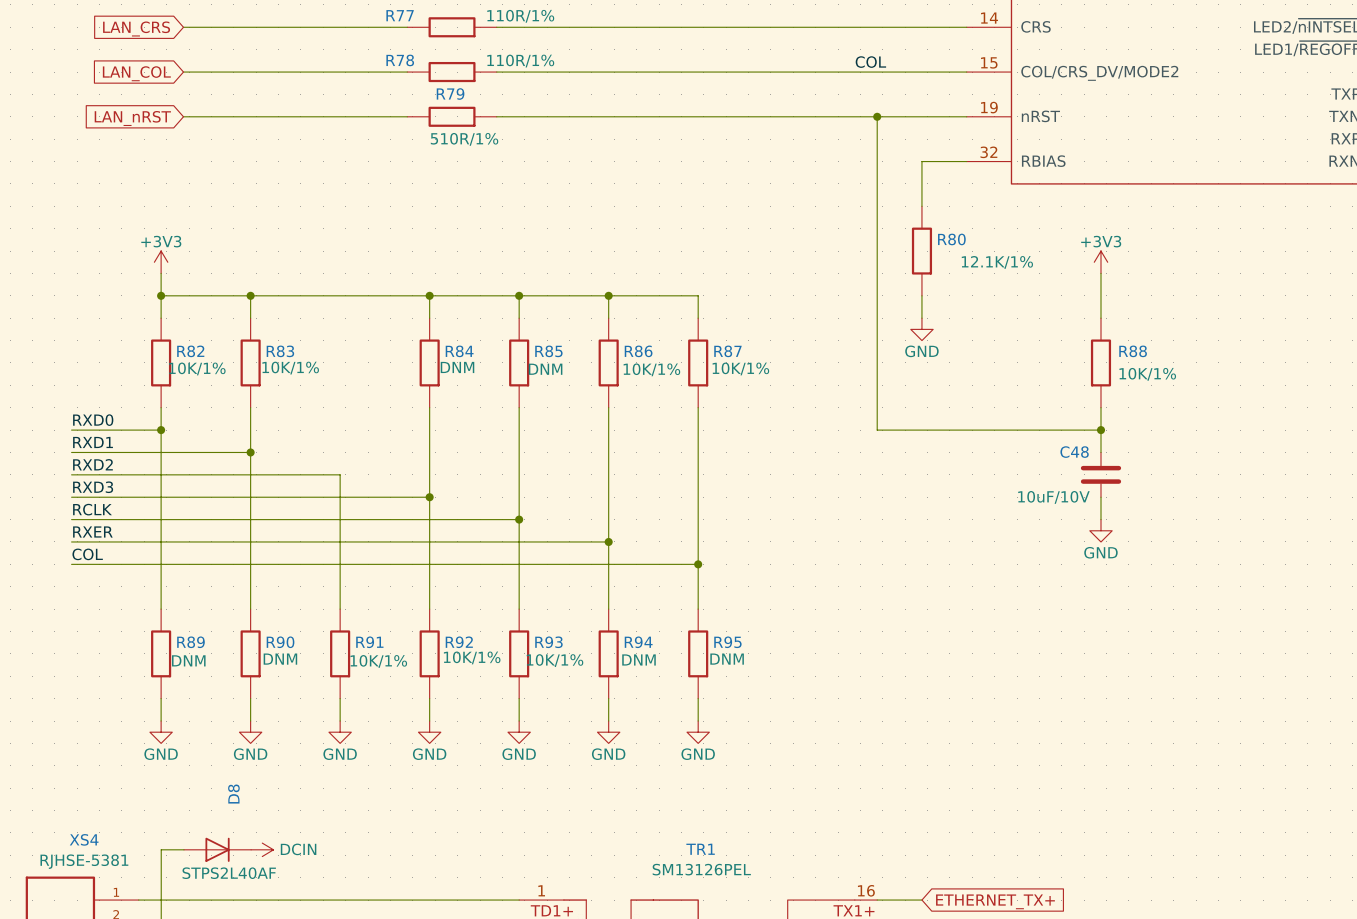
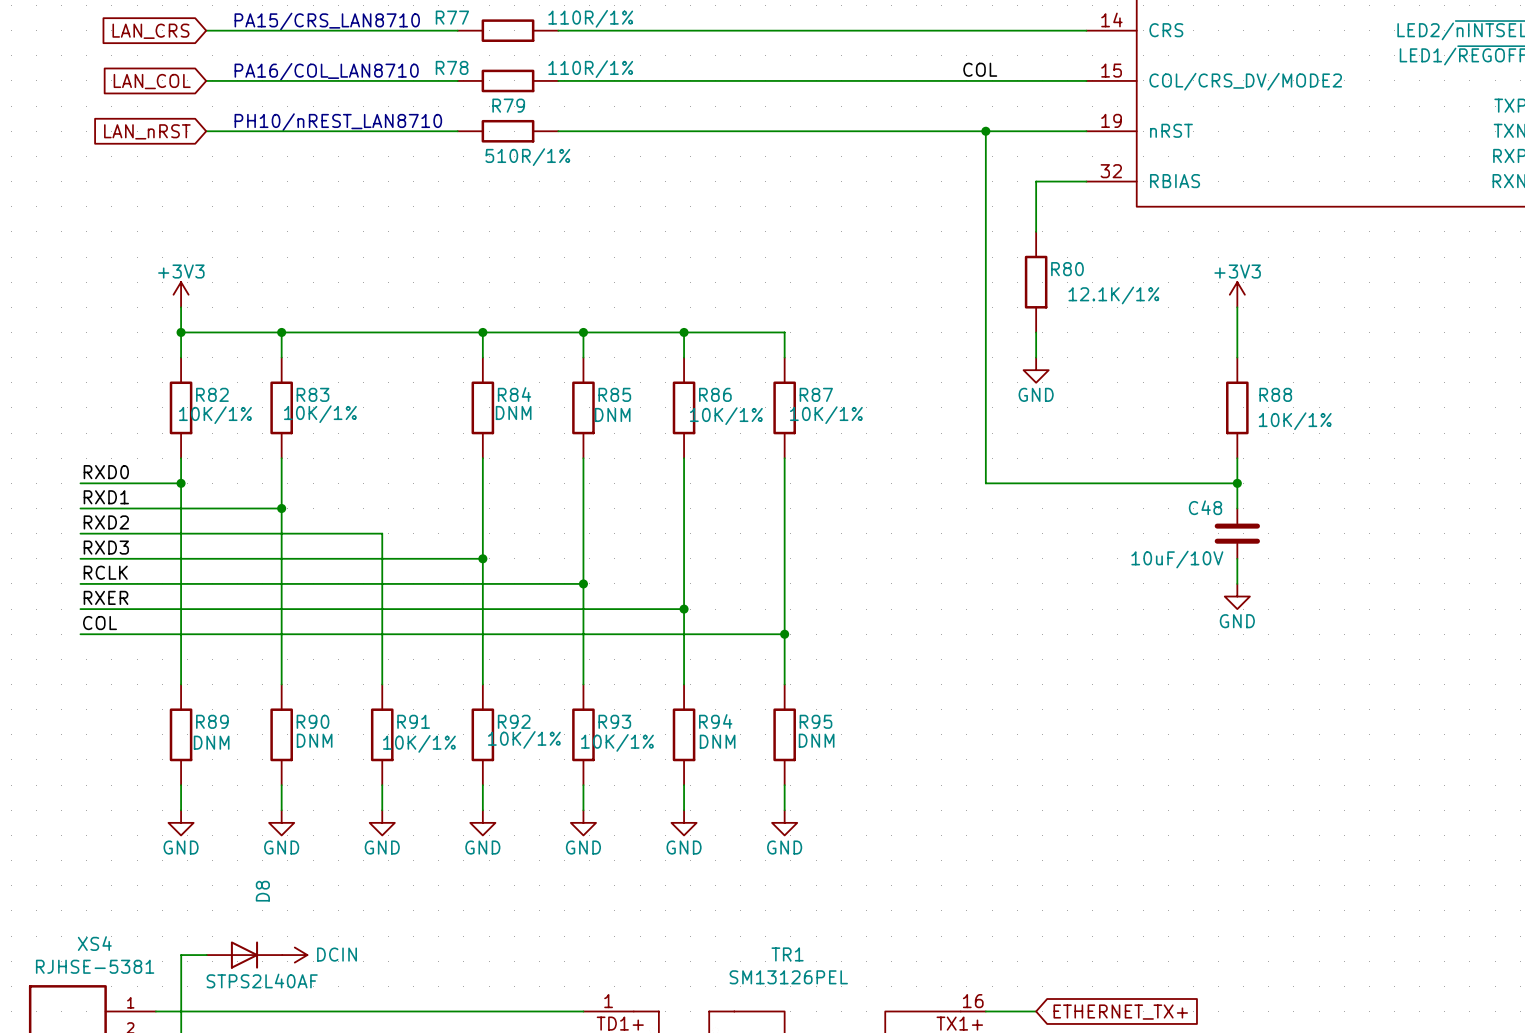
text: none -> PA15/CRS_LAN8710 (327, 21)
text: none -> PA16/COL_LAN8710 (326, 71)
text: none -> PH10/nREST_LAN8710 (338, 122)

